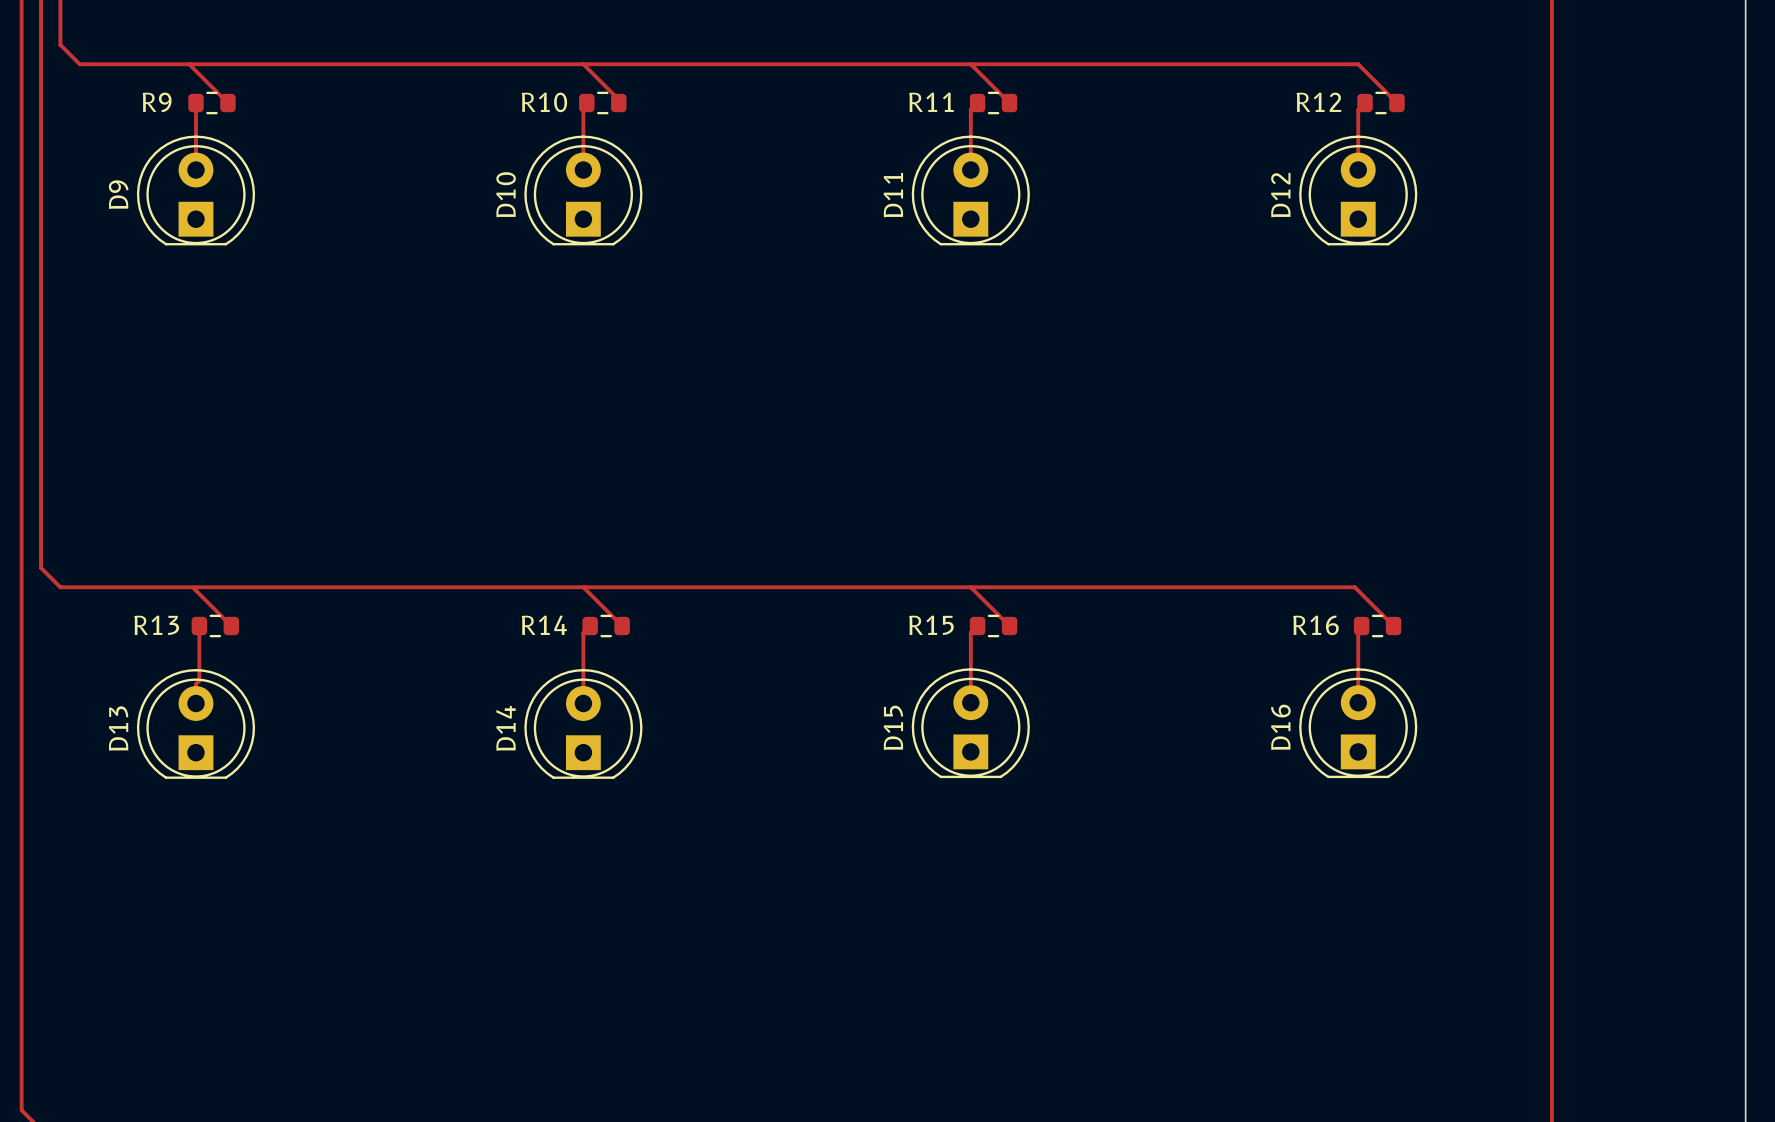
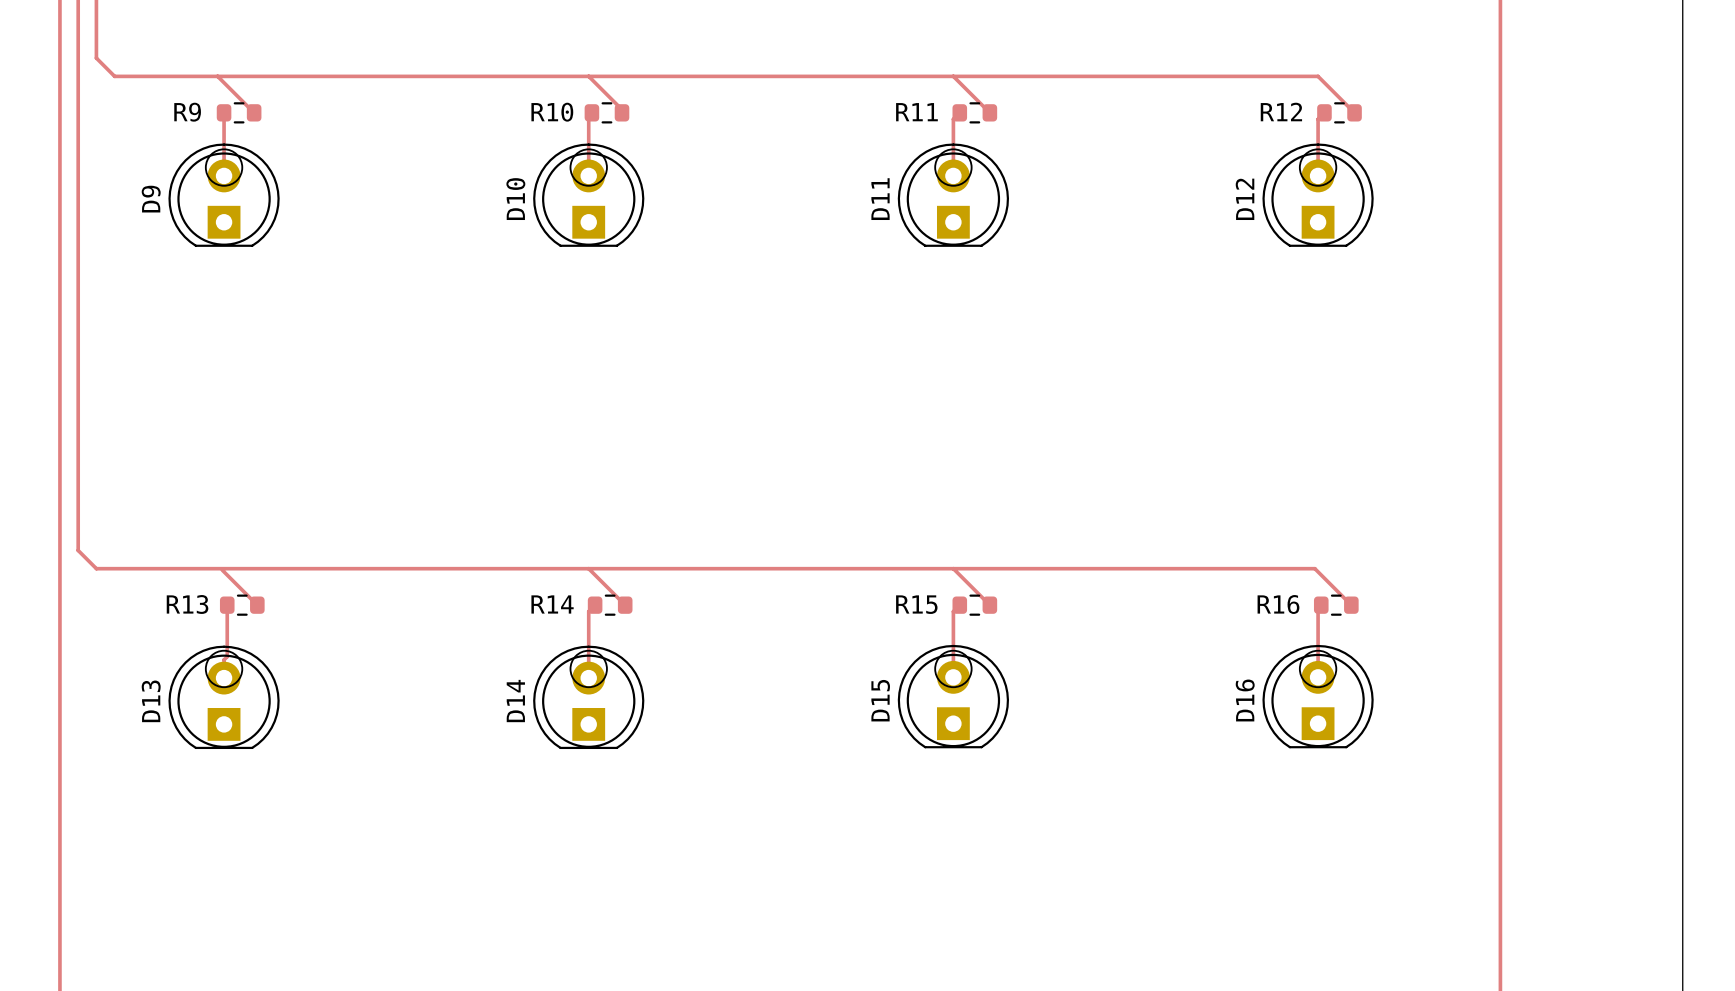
drawing: none -> [204, 148, 244, 187]
drawing: none -> [569, 148, 608, 187]
drawing: none -> [934, 148, 973, 187]
drawing: none -> [1298, 148, 1338, 187]
drawing: none -> [204, 649, 244, 689]
drawing: none -> [569, 649, 608, 689]
drawing: none -> [934, 649, 973, 689]
drawing: none -> [1298, 649, 1338, 689]

